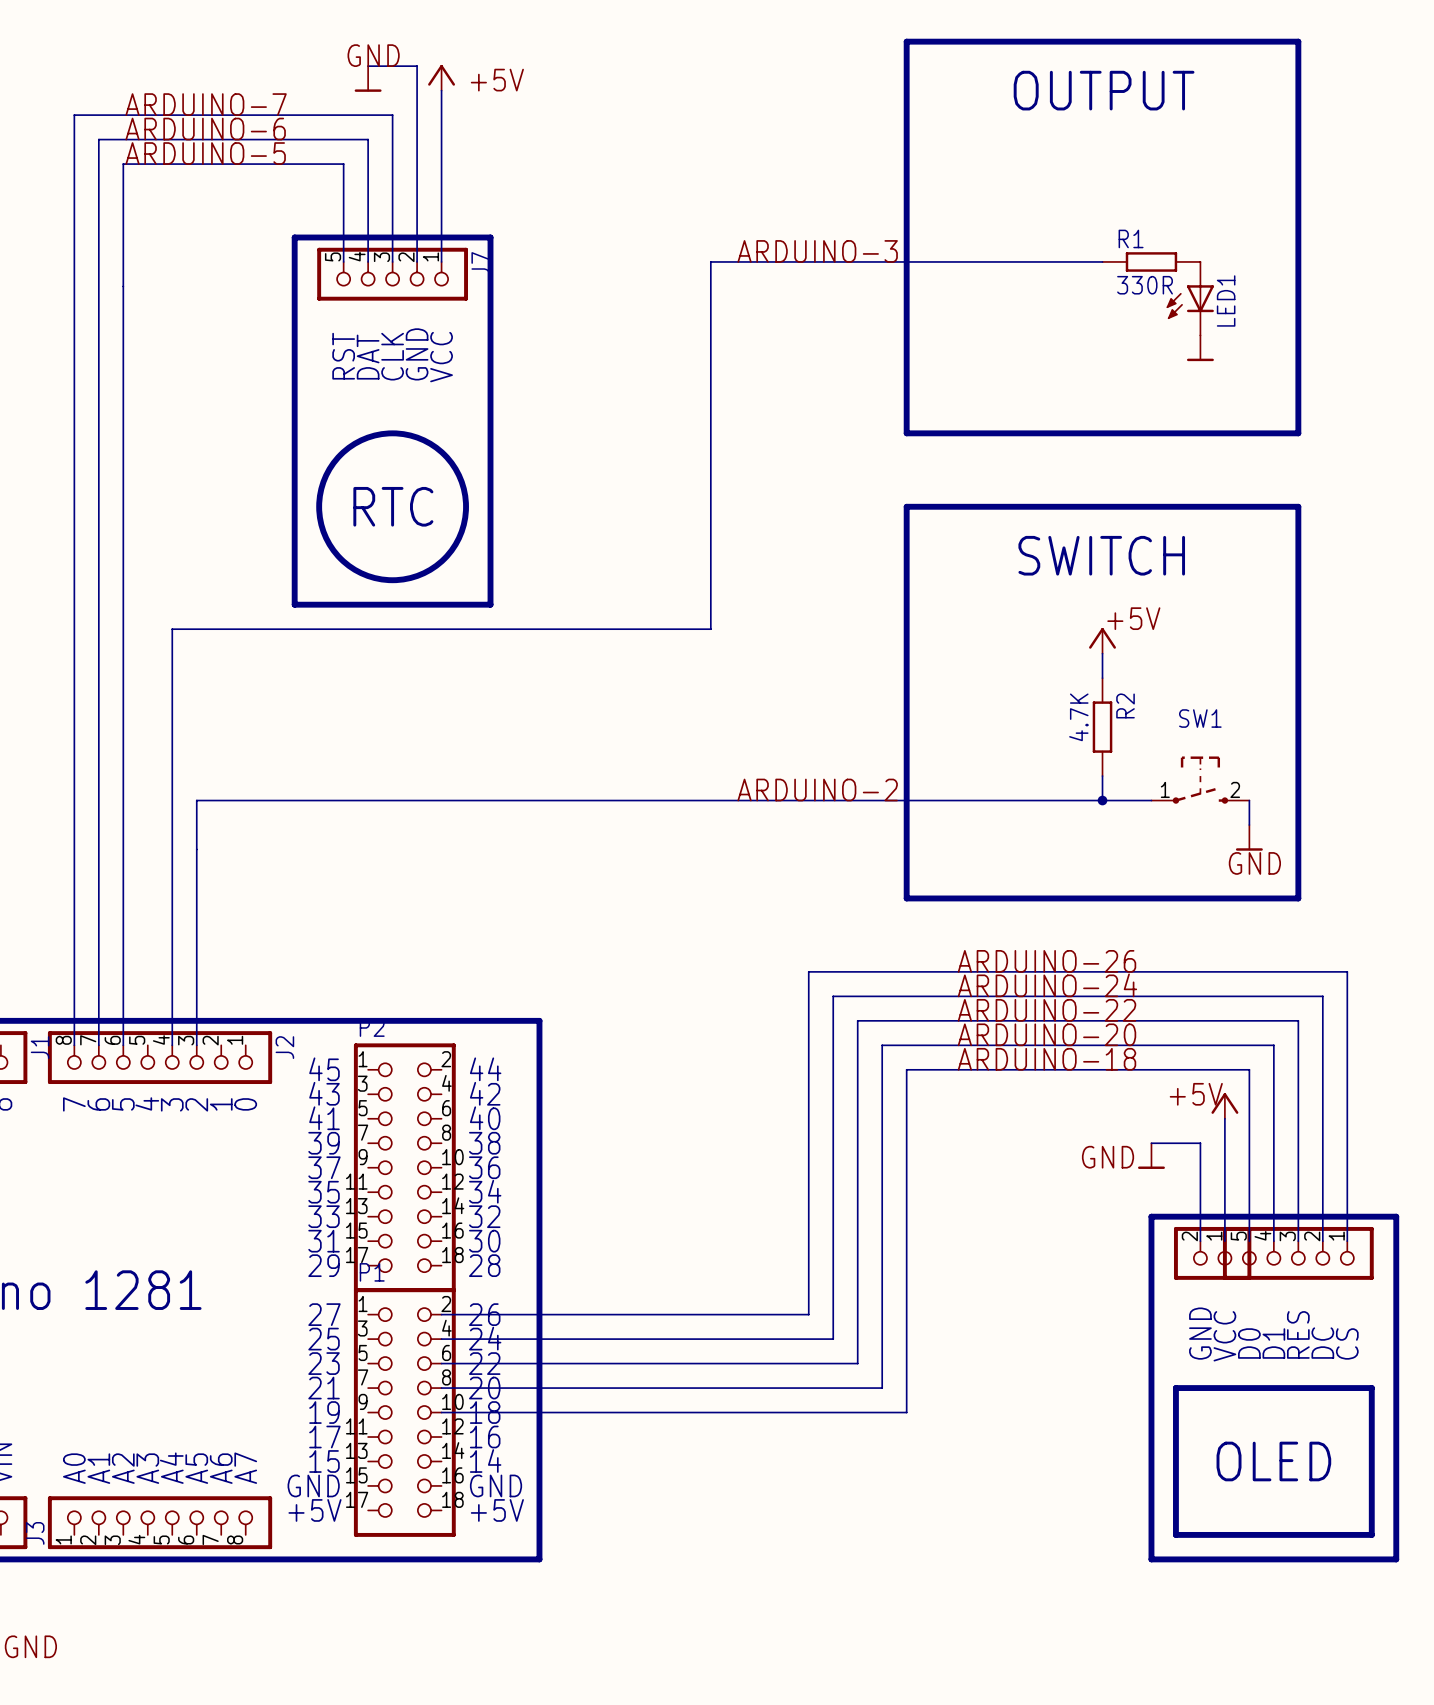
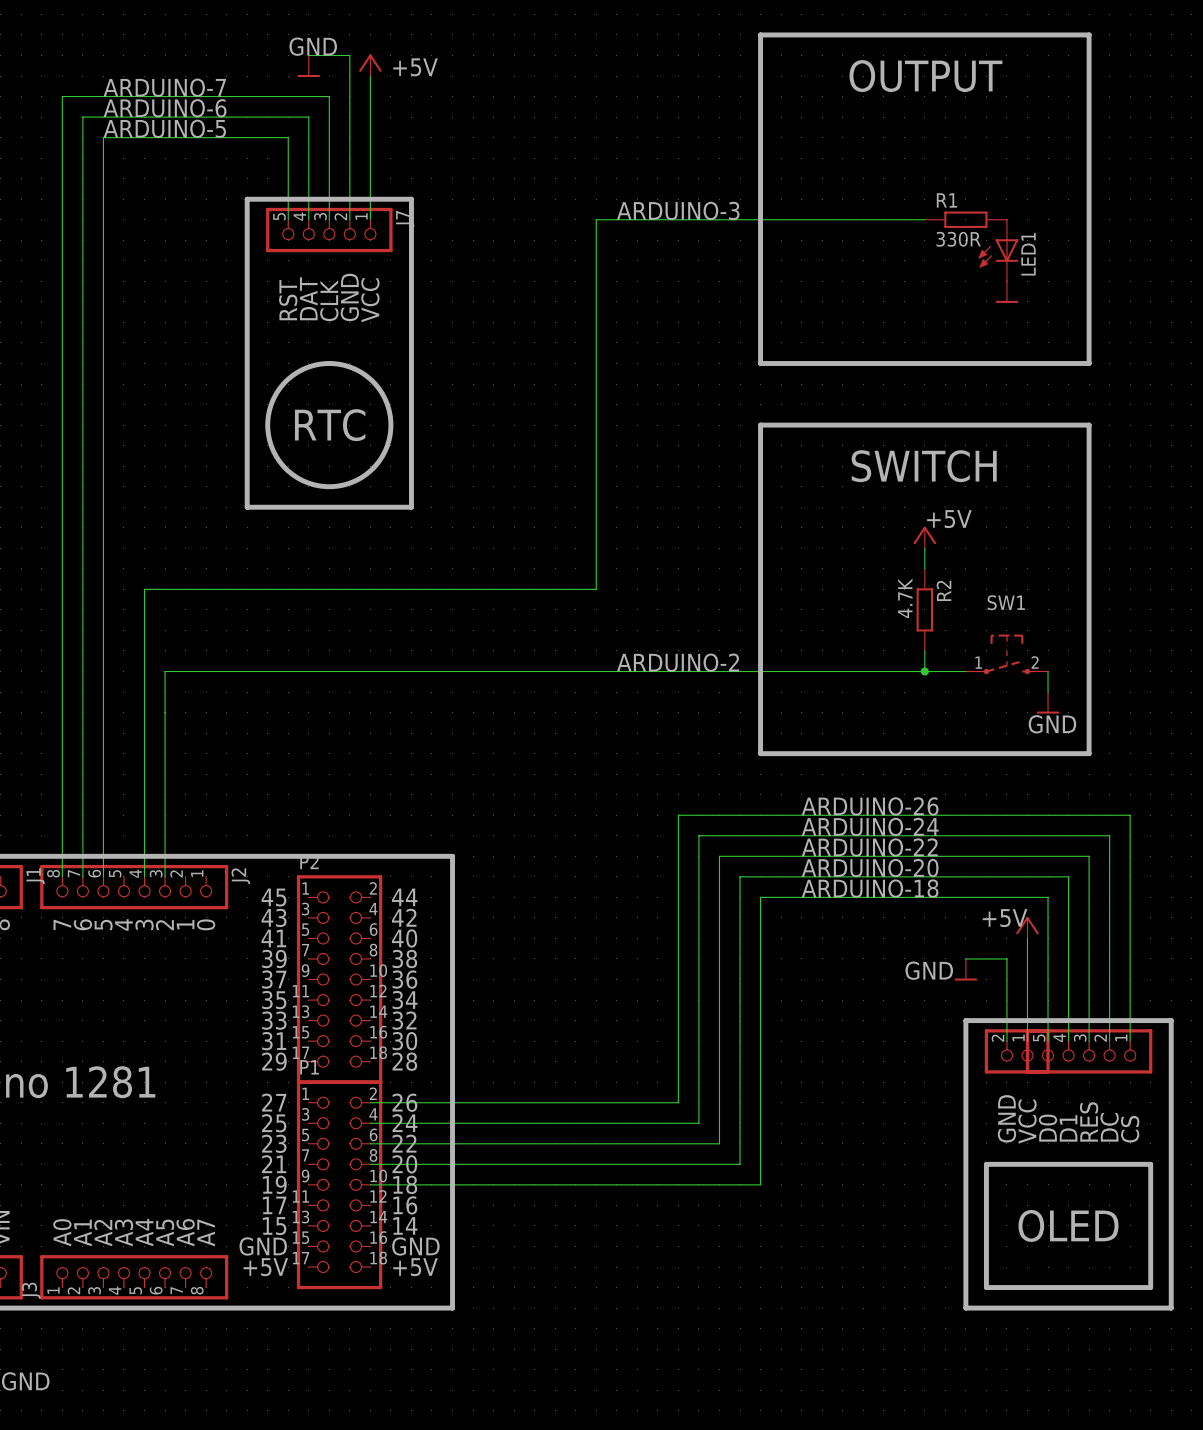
wire: (710, 629) (172, 629) (172, 702) -> (596, 527) (596, 589) (144, 589)

